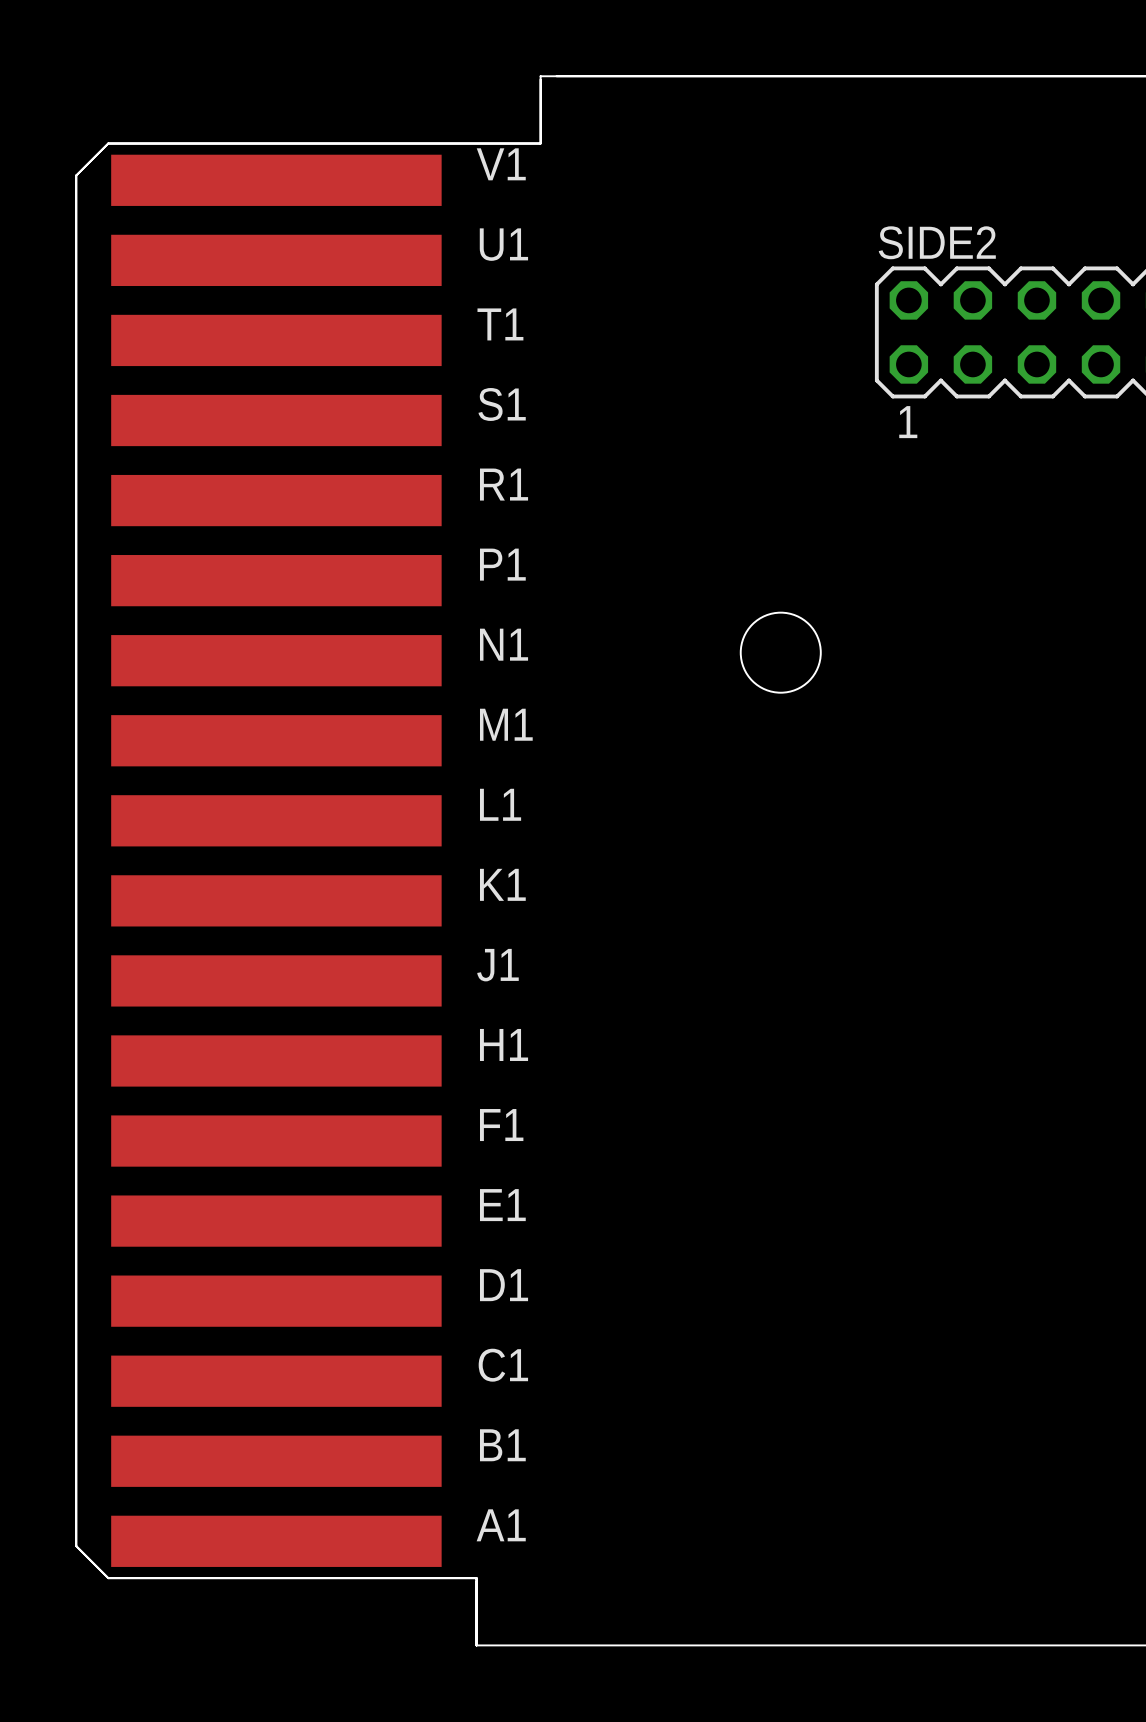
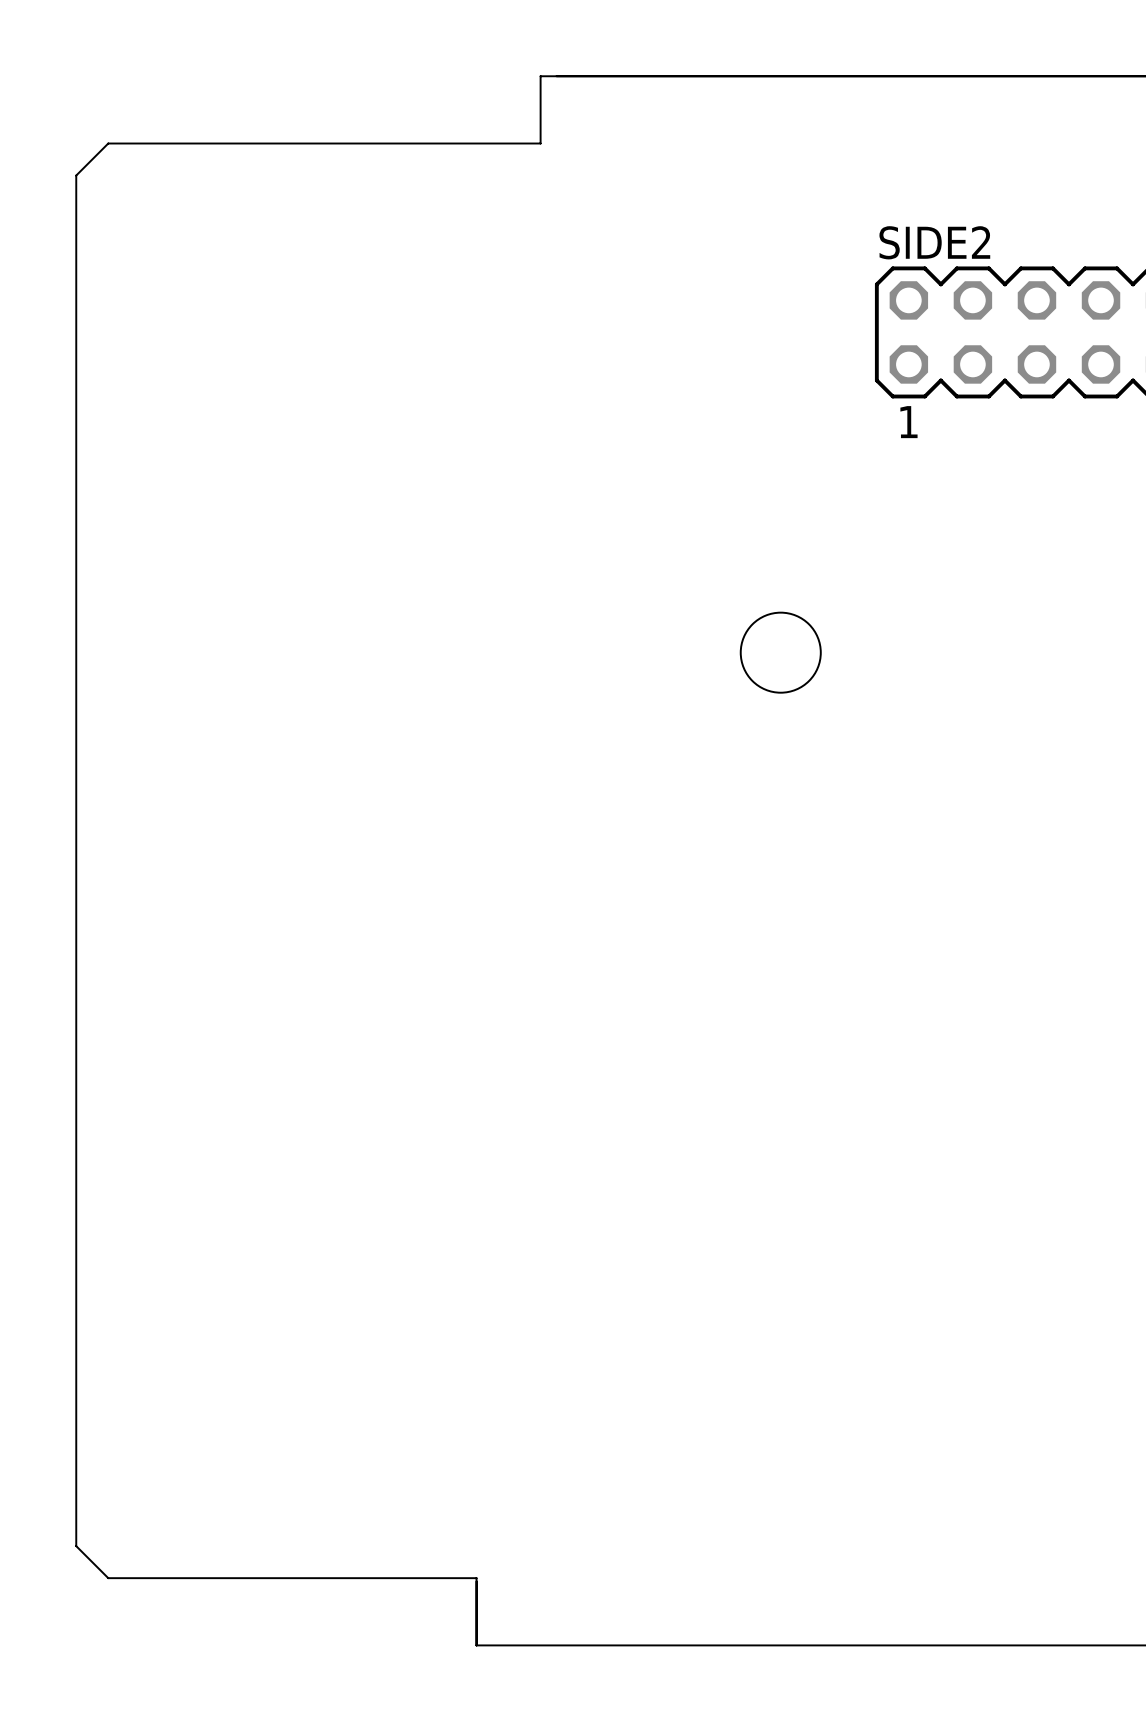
part: (308, 862) -> none

